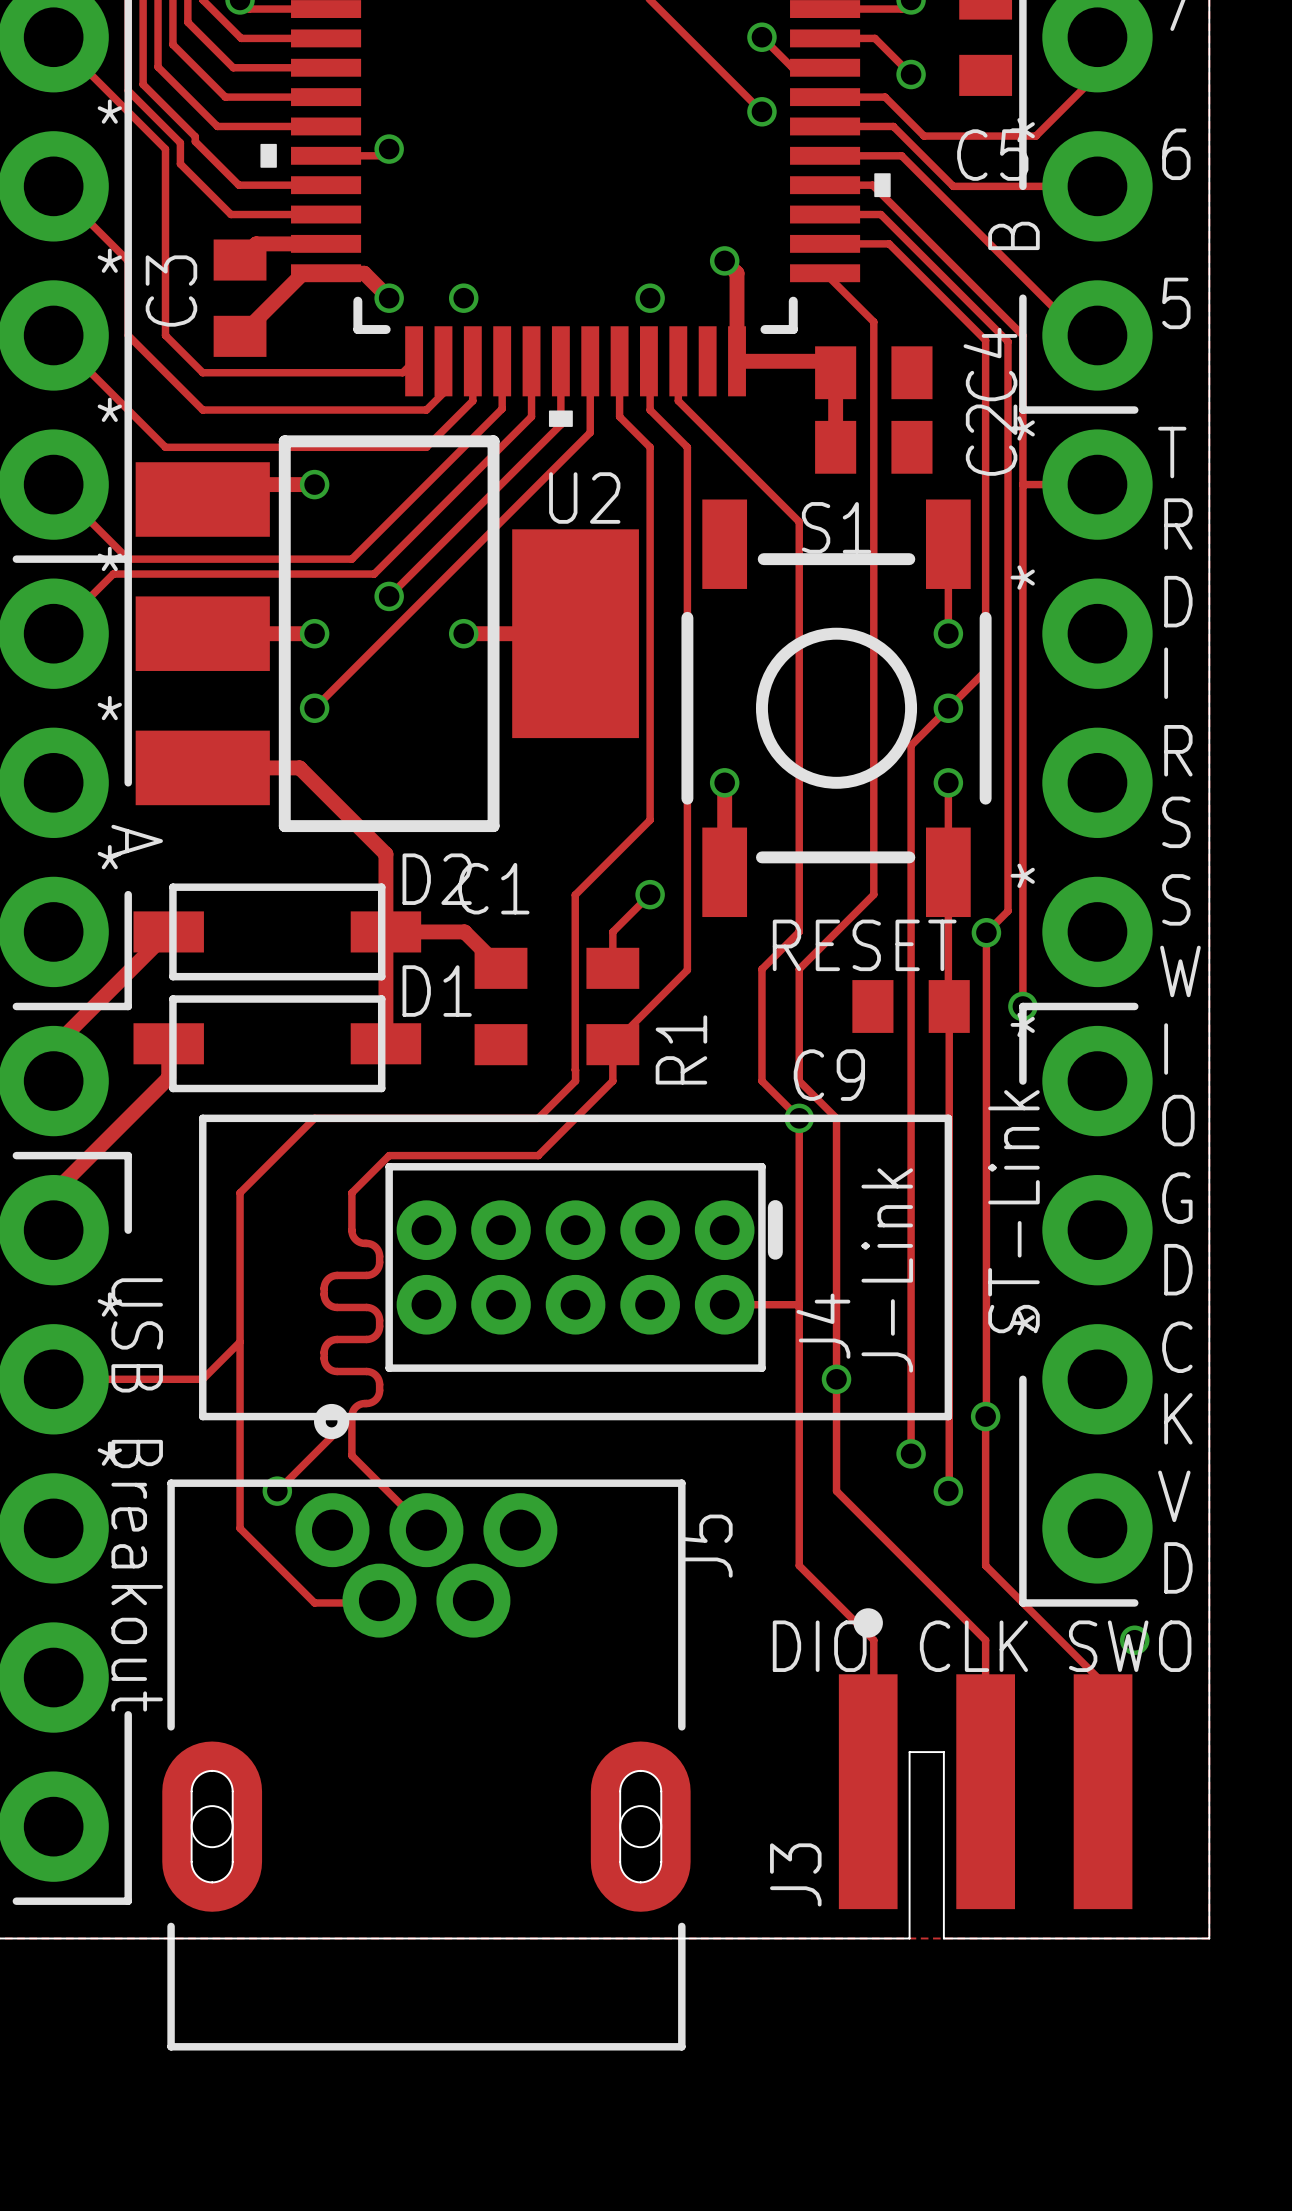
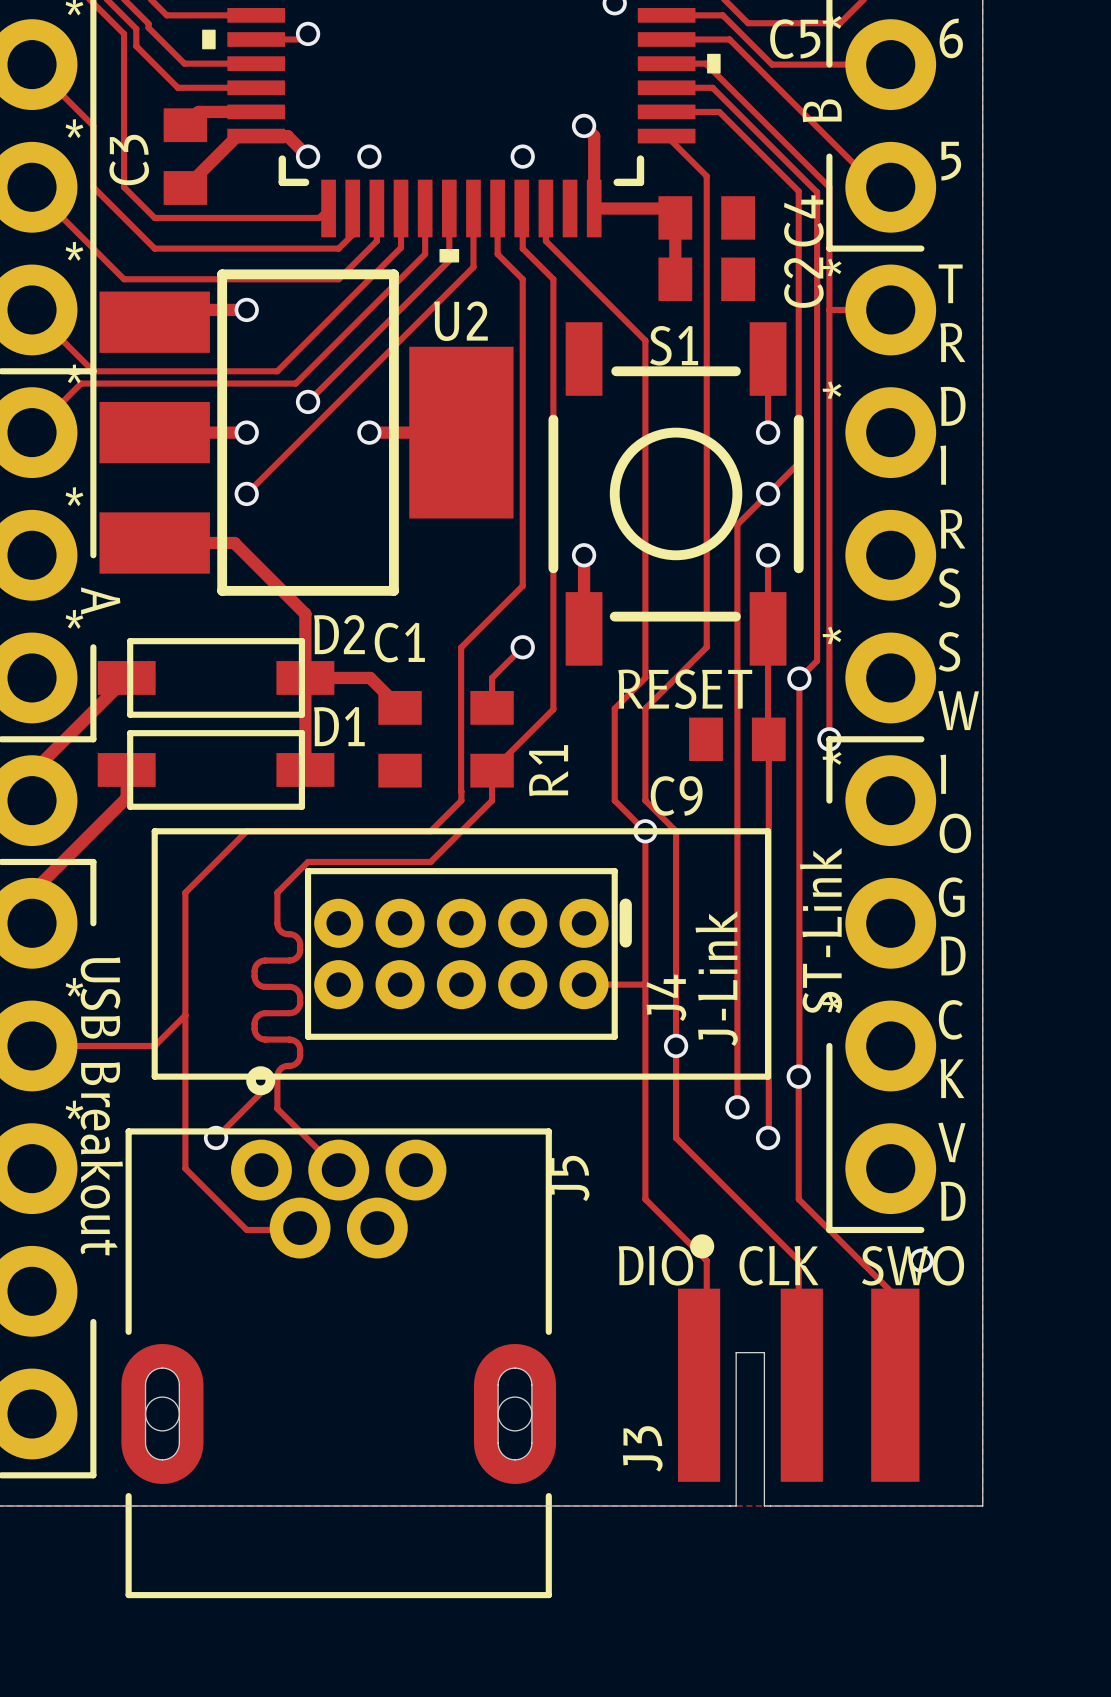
J3 footprint: [838, 1608, 1133, 1910] -> [677, 1234, 920, 1482]

